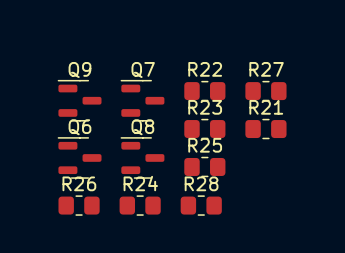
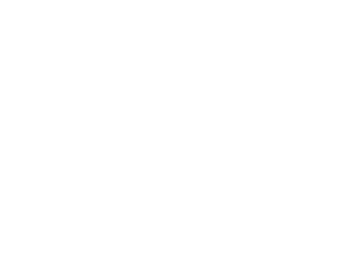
R22: (204, 91) -> none
R27: (265, 91) -> none
Q9: (79, 100) -> none
Q7: (142, 100) -> none
R23: (204, 129) -> none
R21: (265, 129) -> none
Q6: (79, 157) -> none
Q8: (142, 157) -> none
R25: (204, 166) -> none
R26: (79, 205) -> none
R24: (140, 205) -> none
R28: (201, 205) -> none

